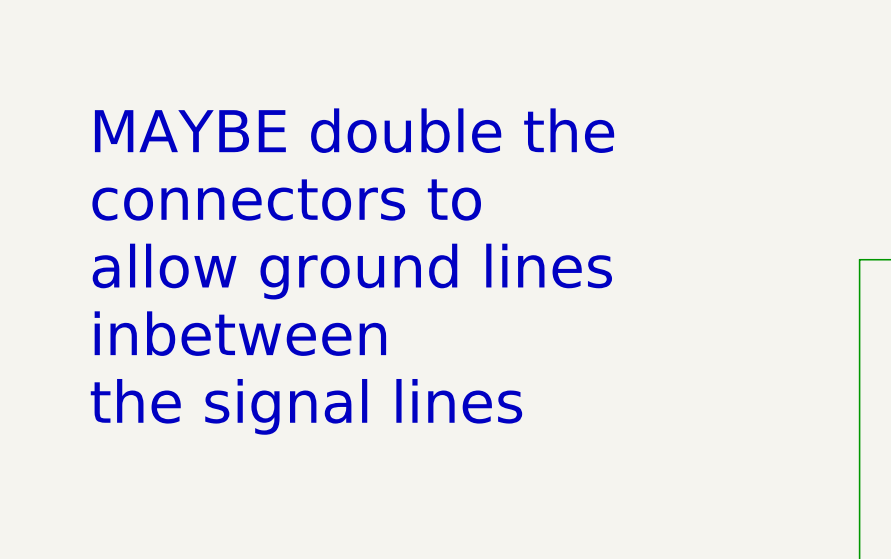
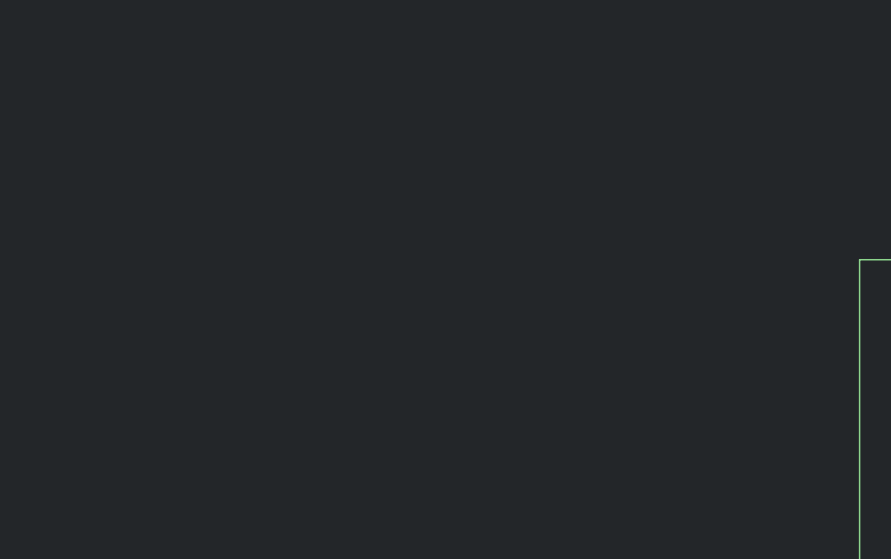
text: MAYBE double the (354, 130) -> none
text: connectors to (286, 199) -> none
text: allow ground lines (352, 271) -> none
text: inbetween (240, 333) -> none
text: the signal lines (306, 406) -> none

